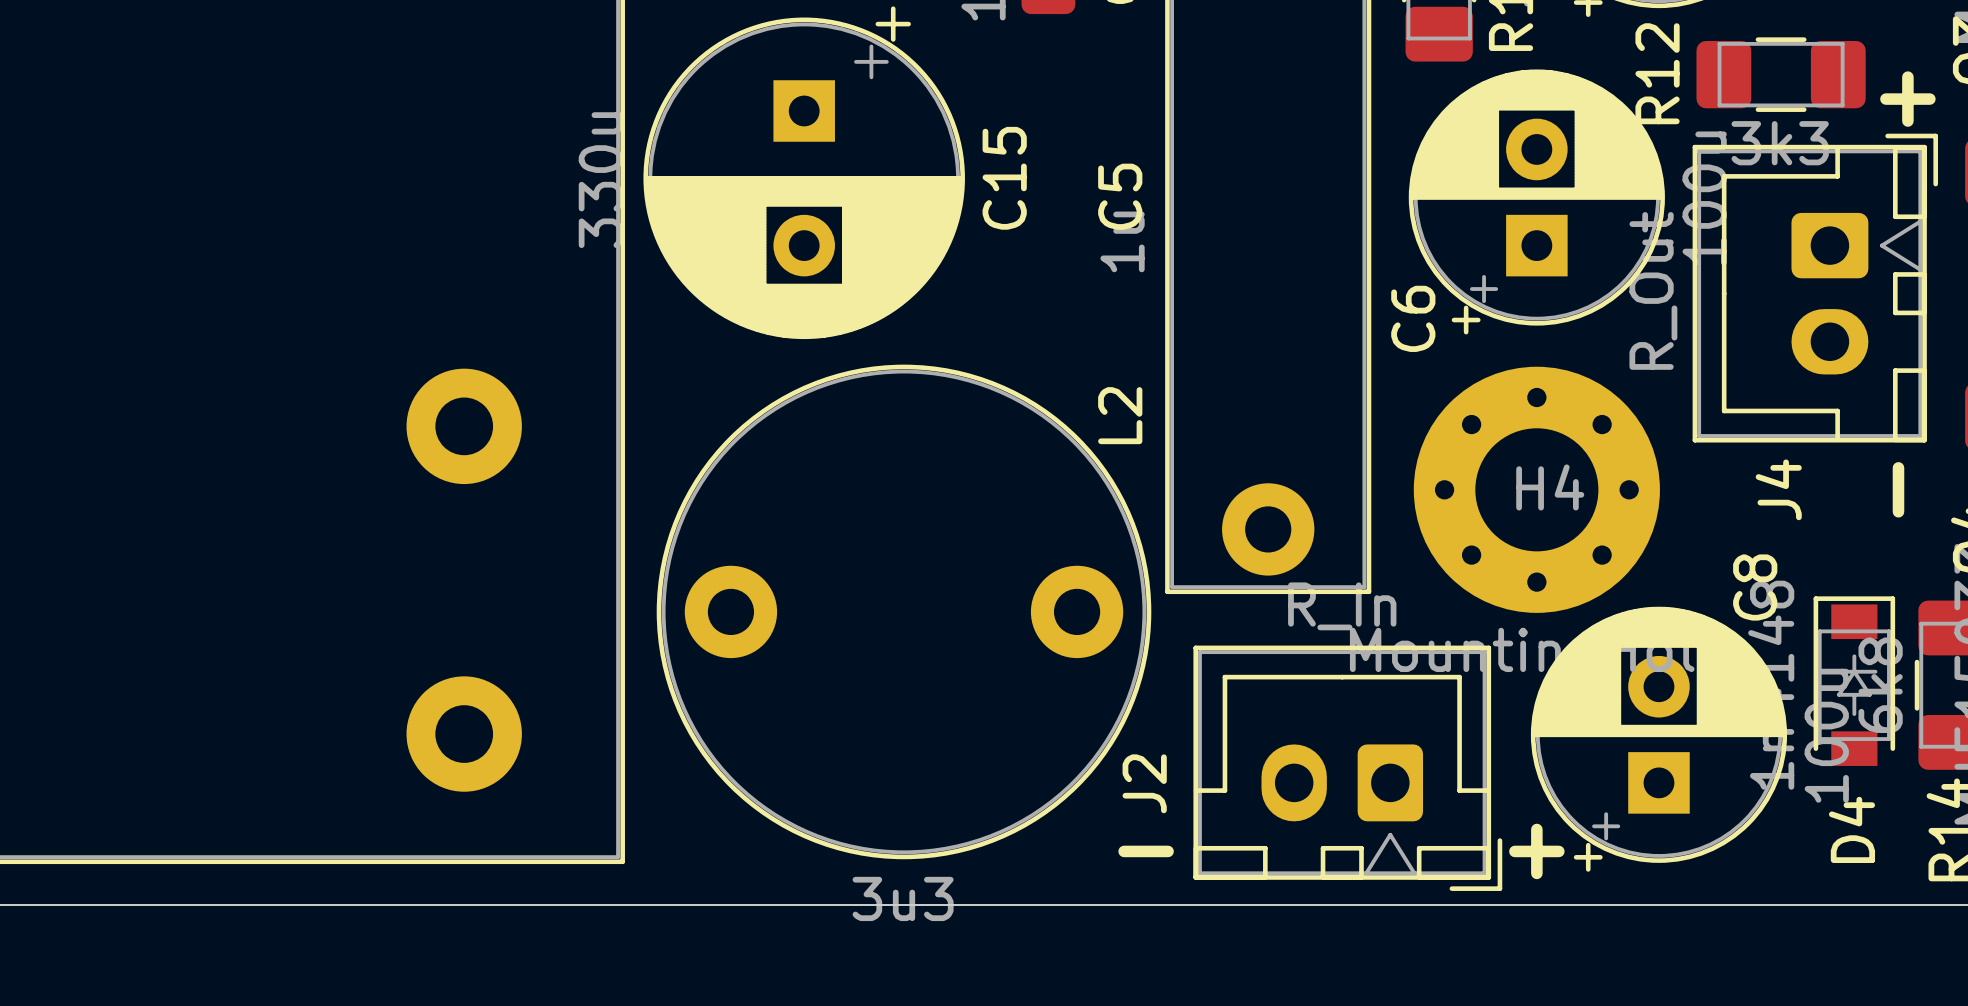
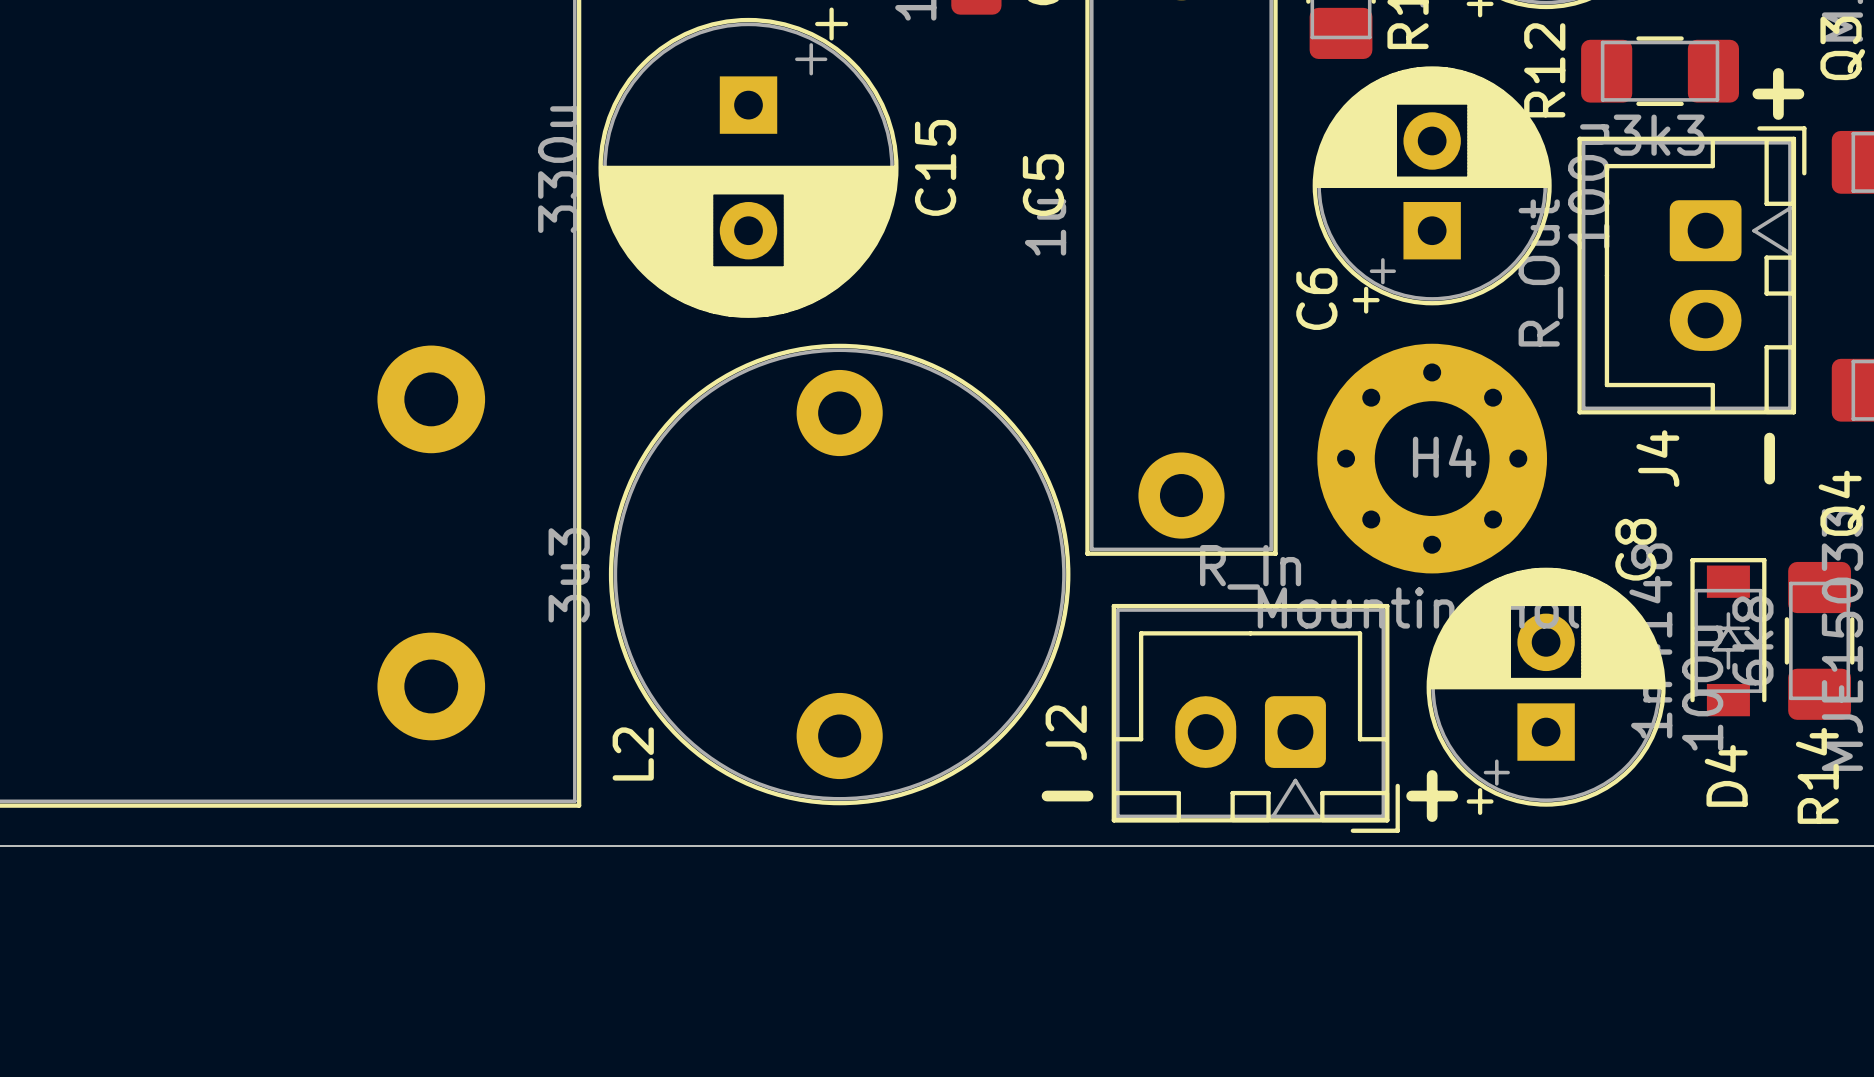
L2 name position: L2 (1120, 415) -> L2 (633, 753)
L2 rotation: 0° (904, 611) -> 90° clockwise (839, 574)

